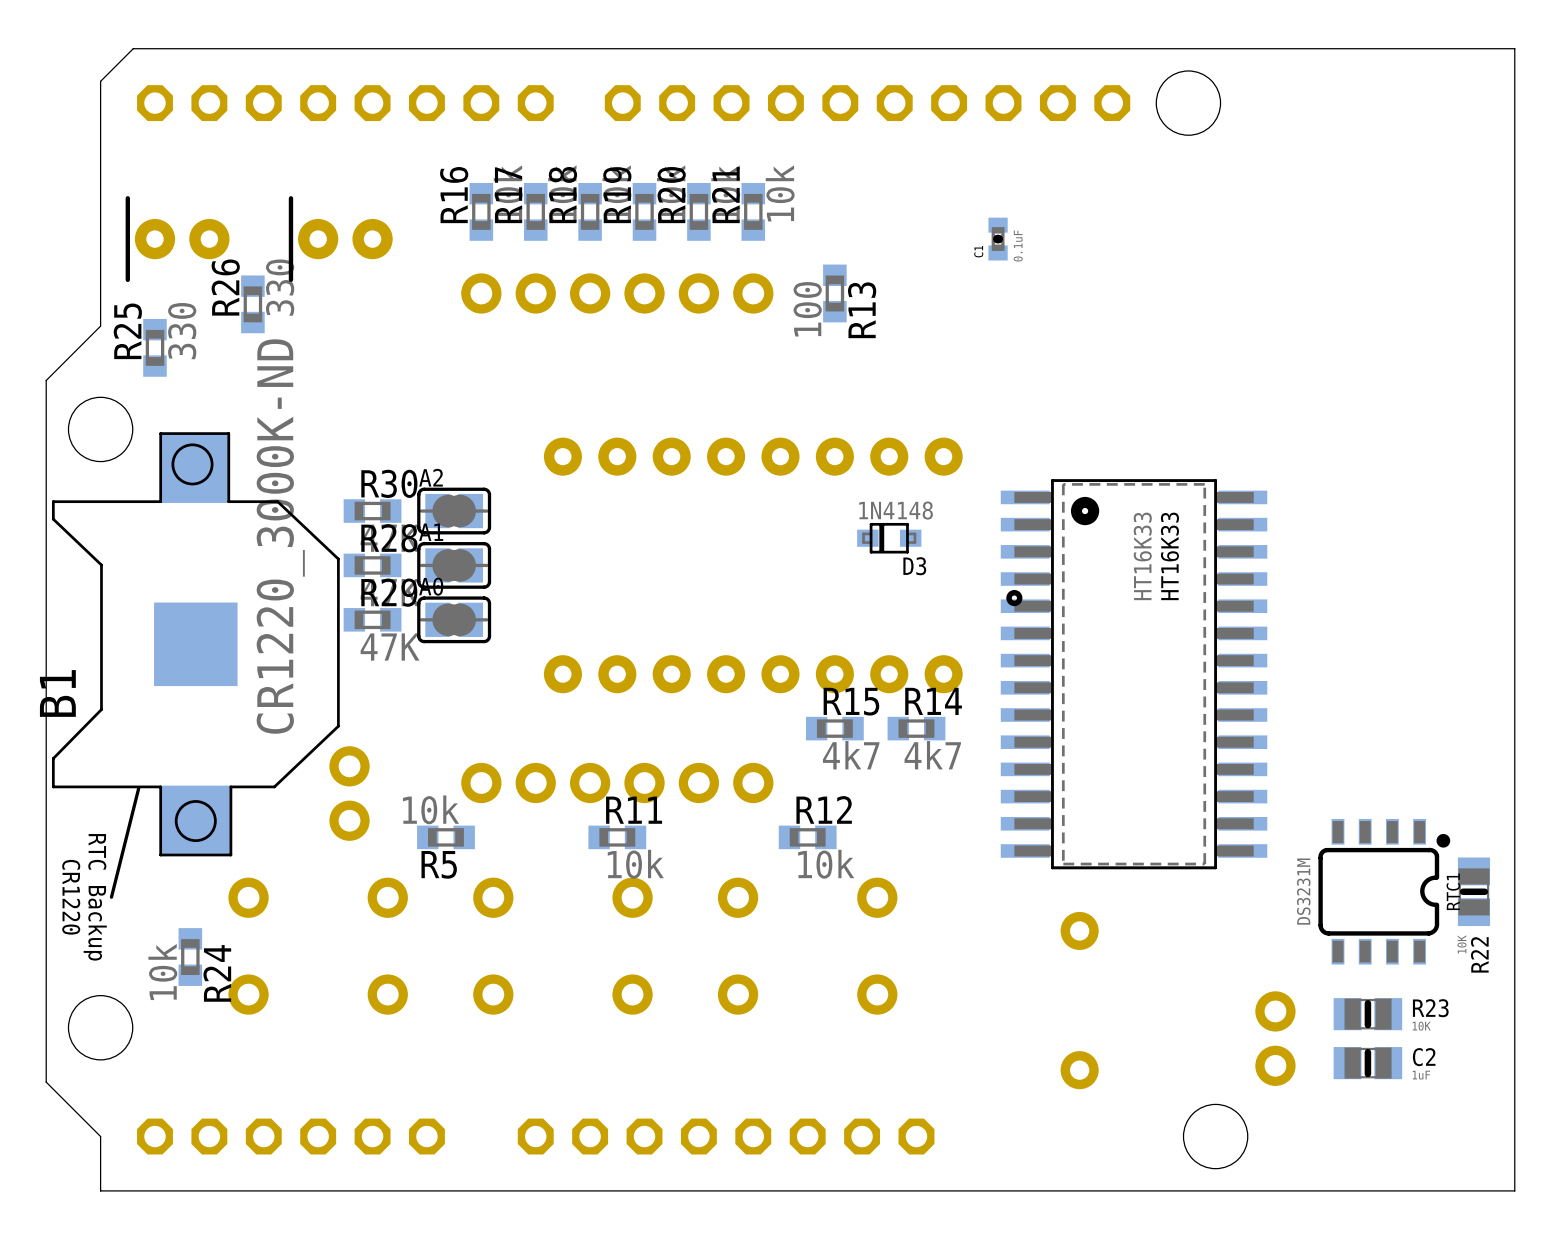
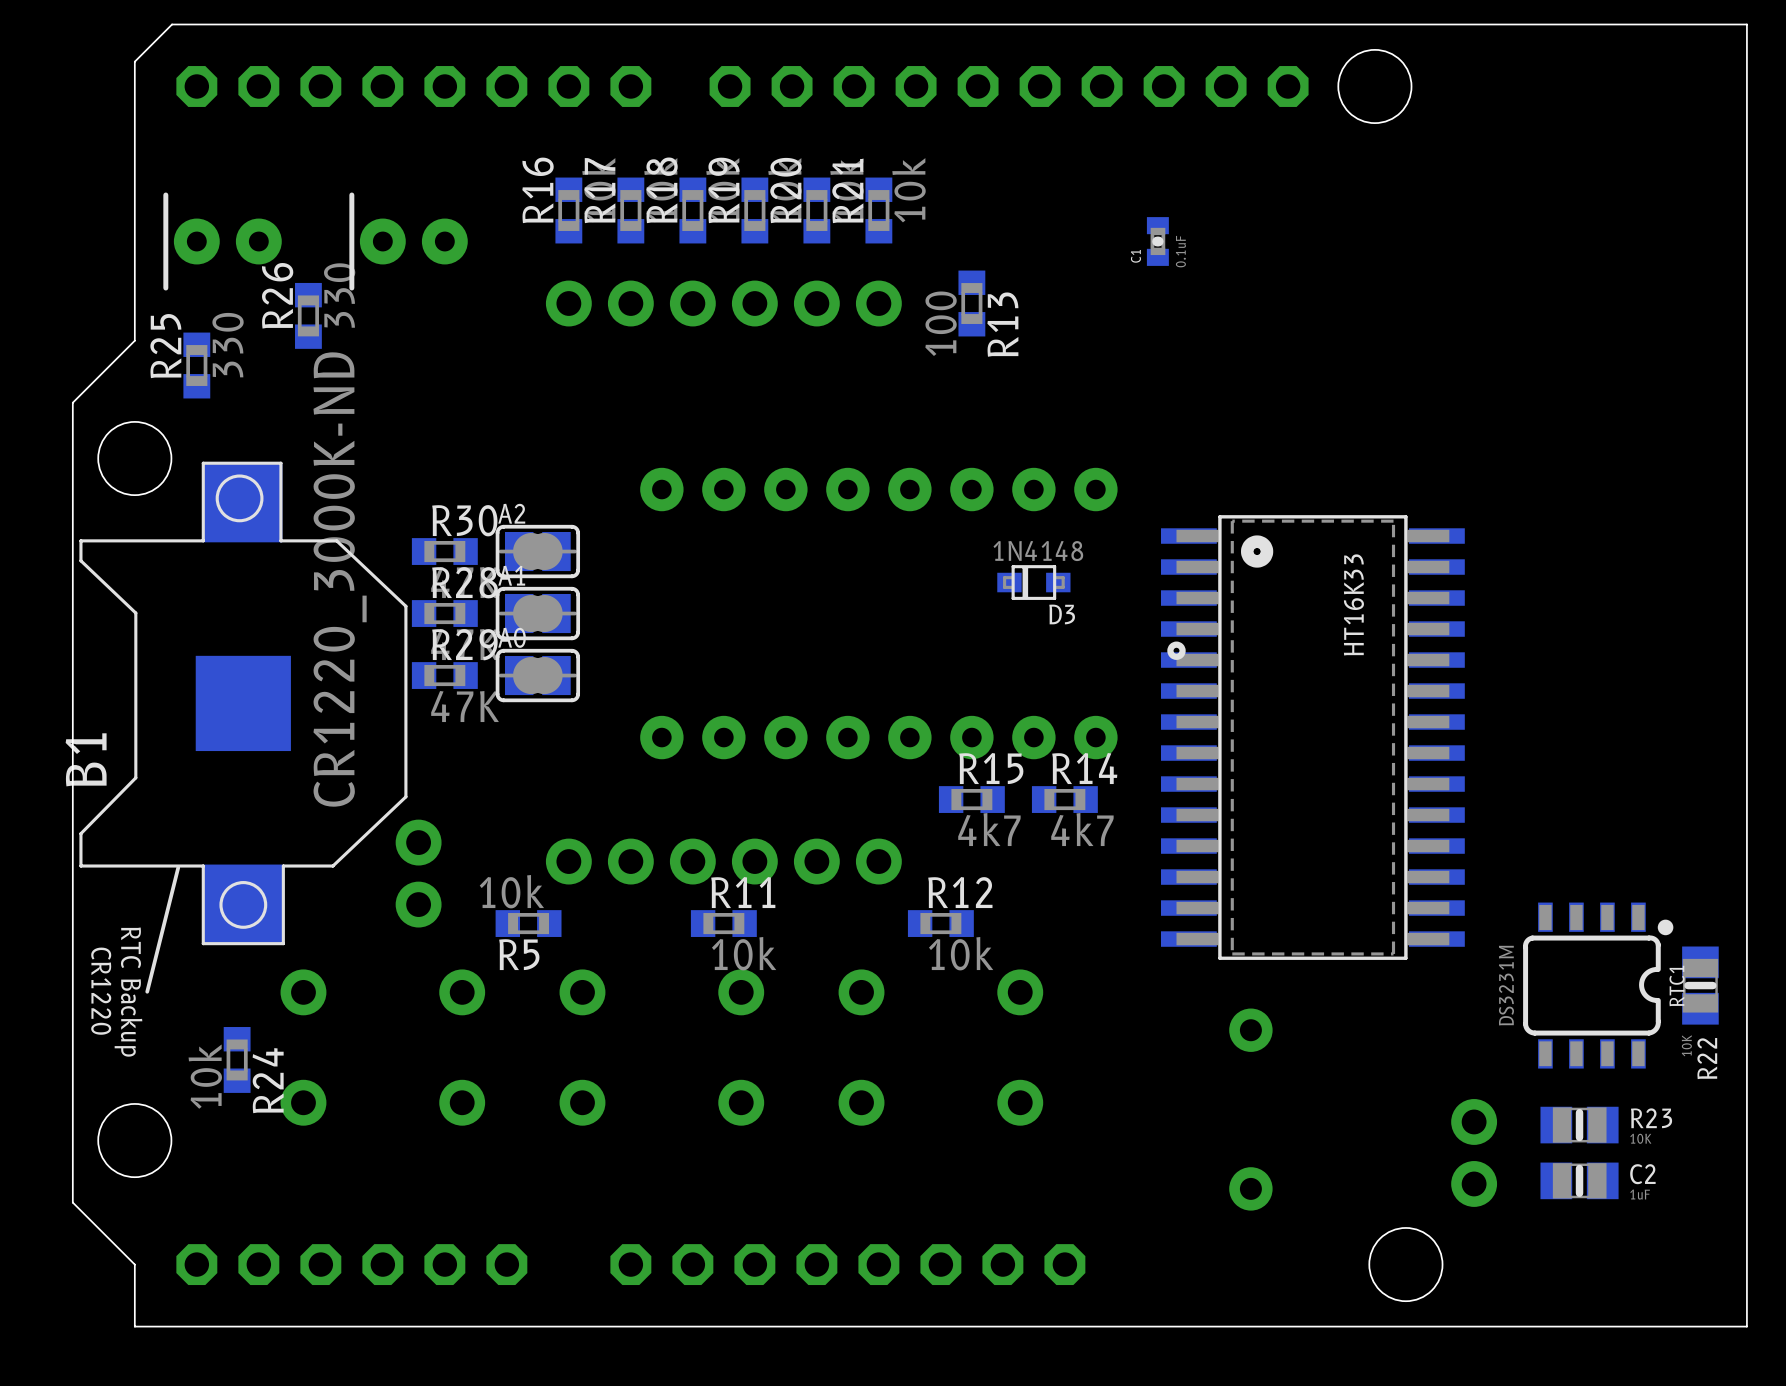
HT16K33 value: HT16K33 (1142, 556) -> none

